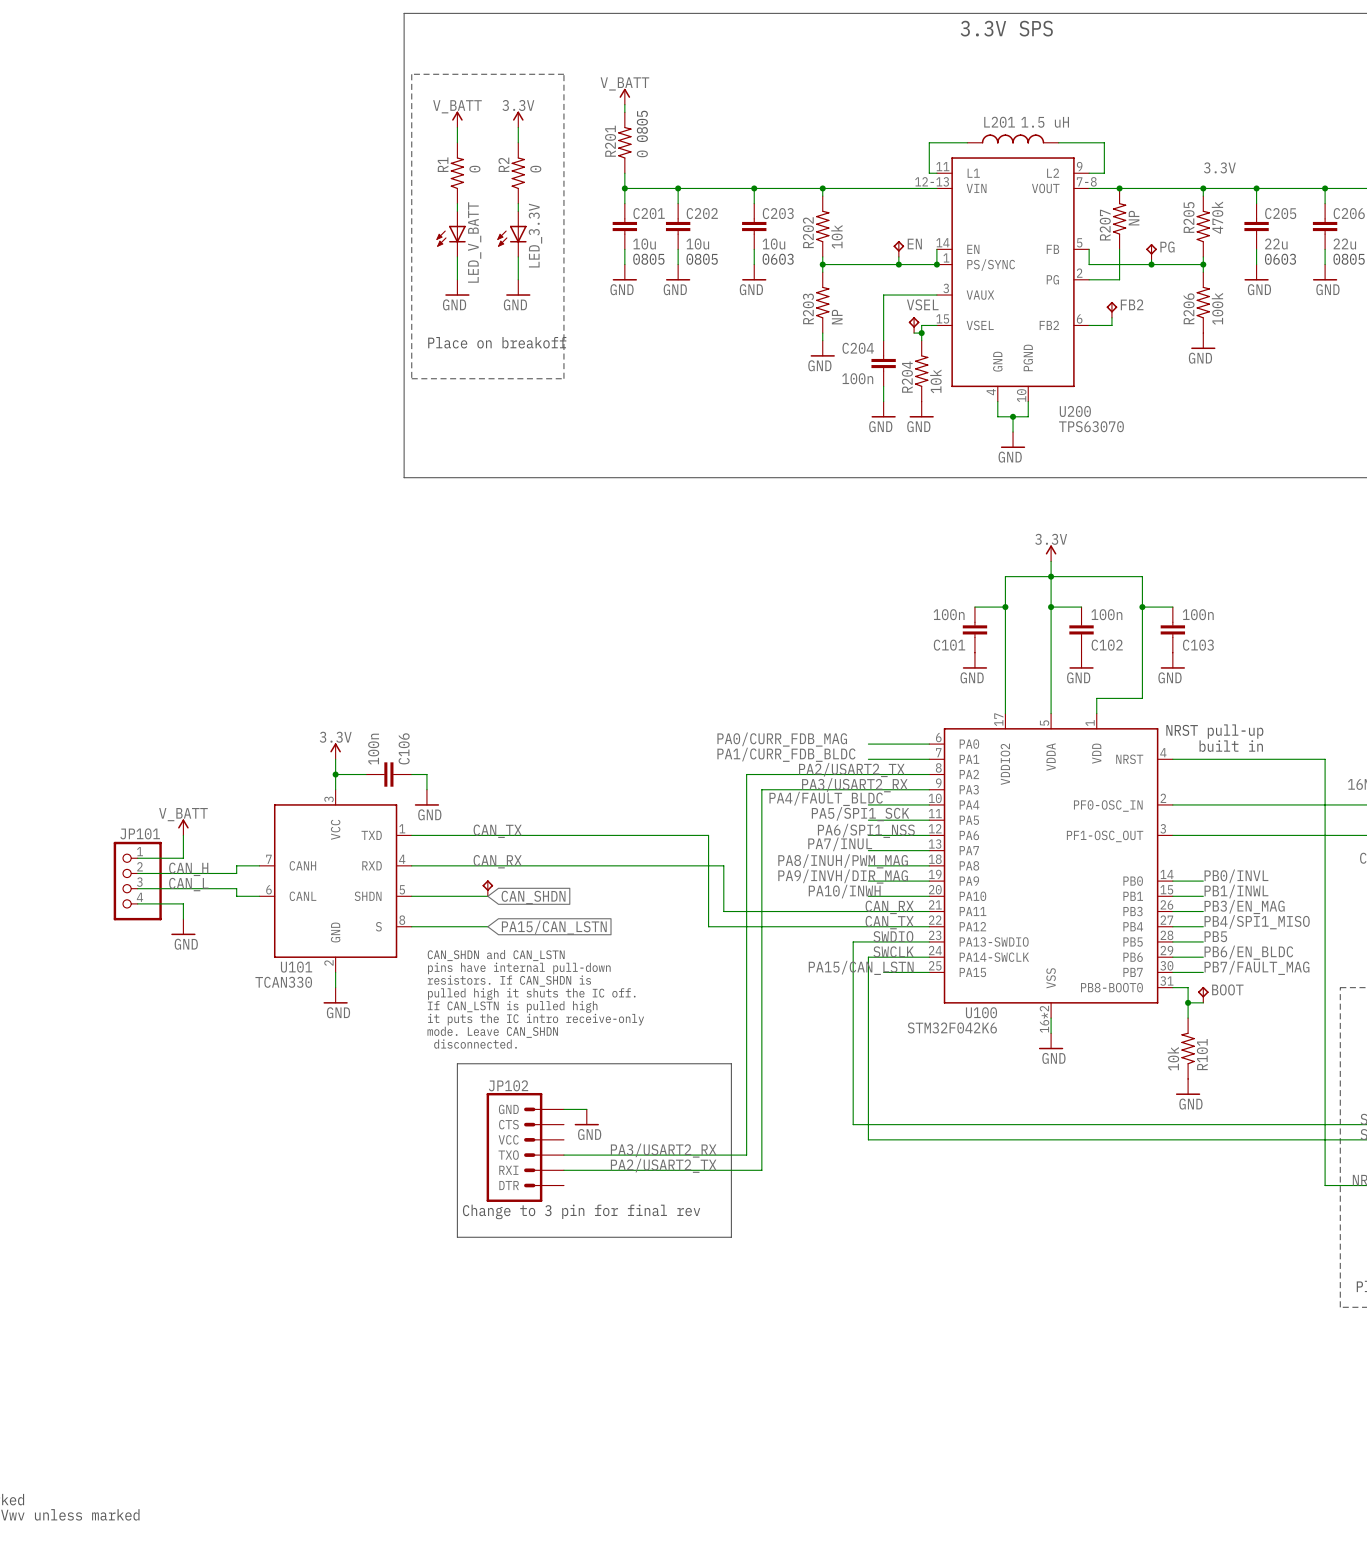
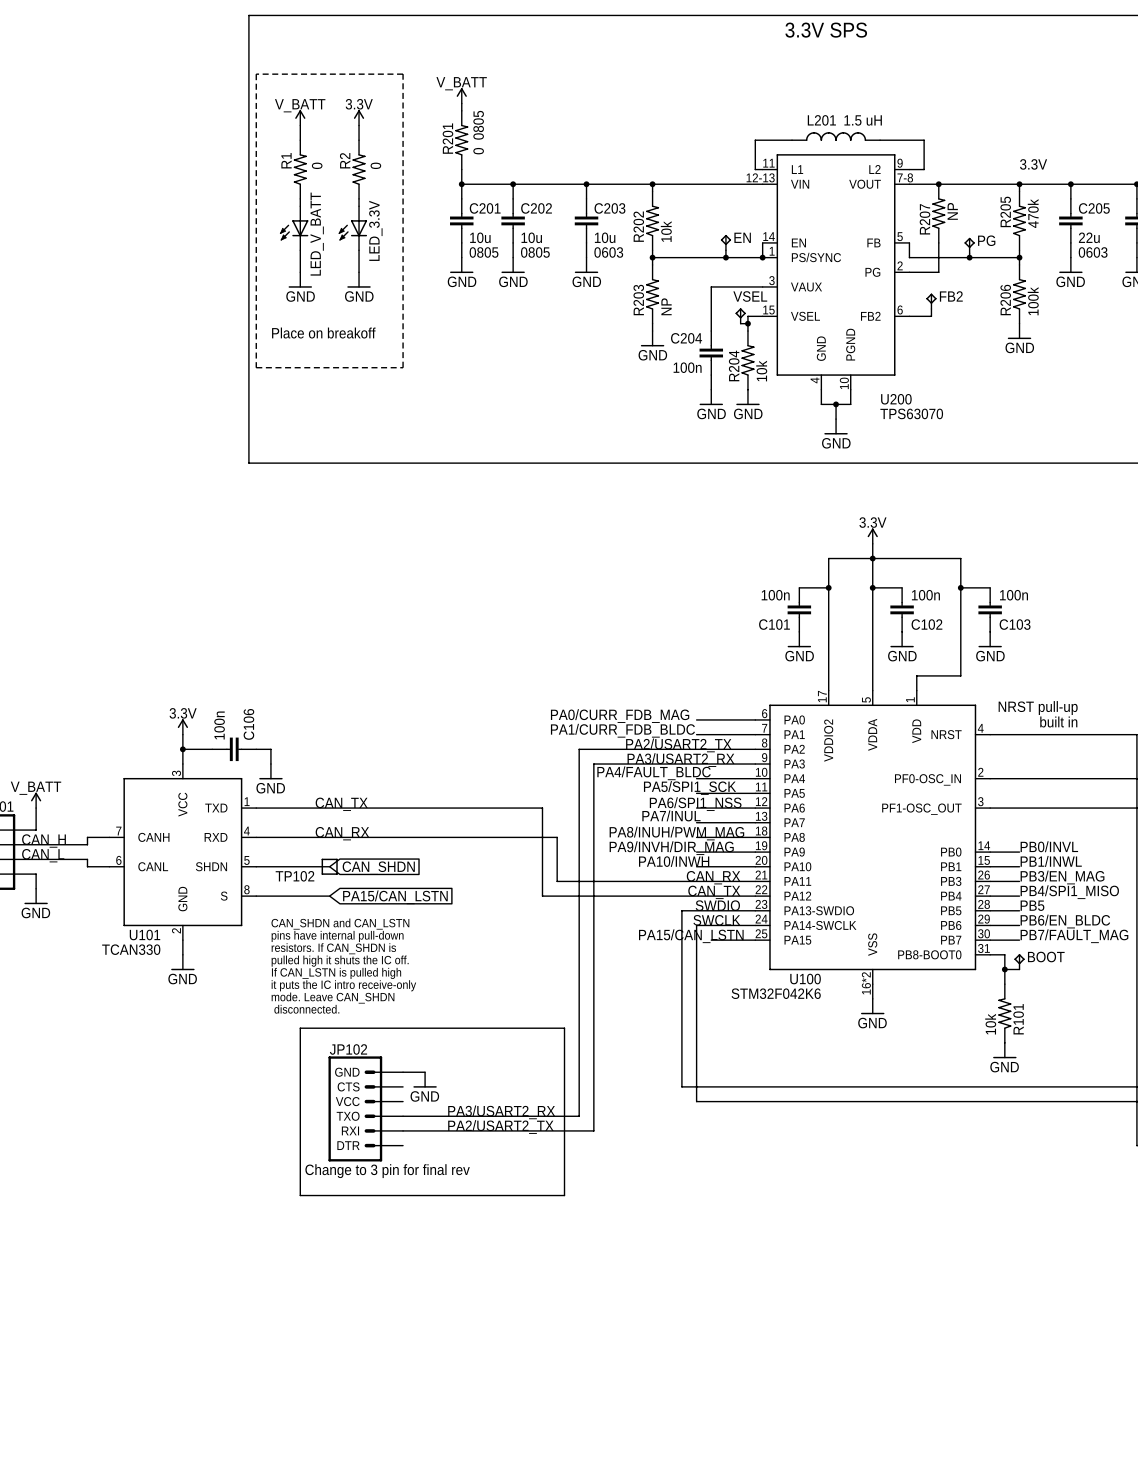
part: (487, 888) -> none
TP102: none -> (329, 866)

